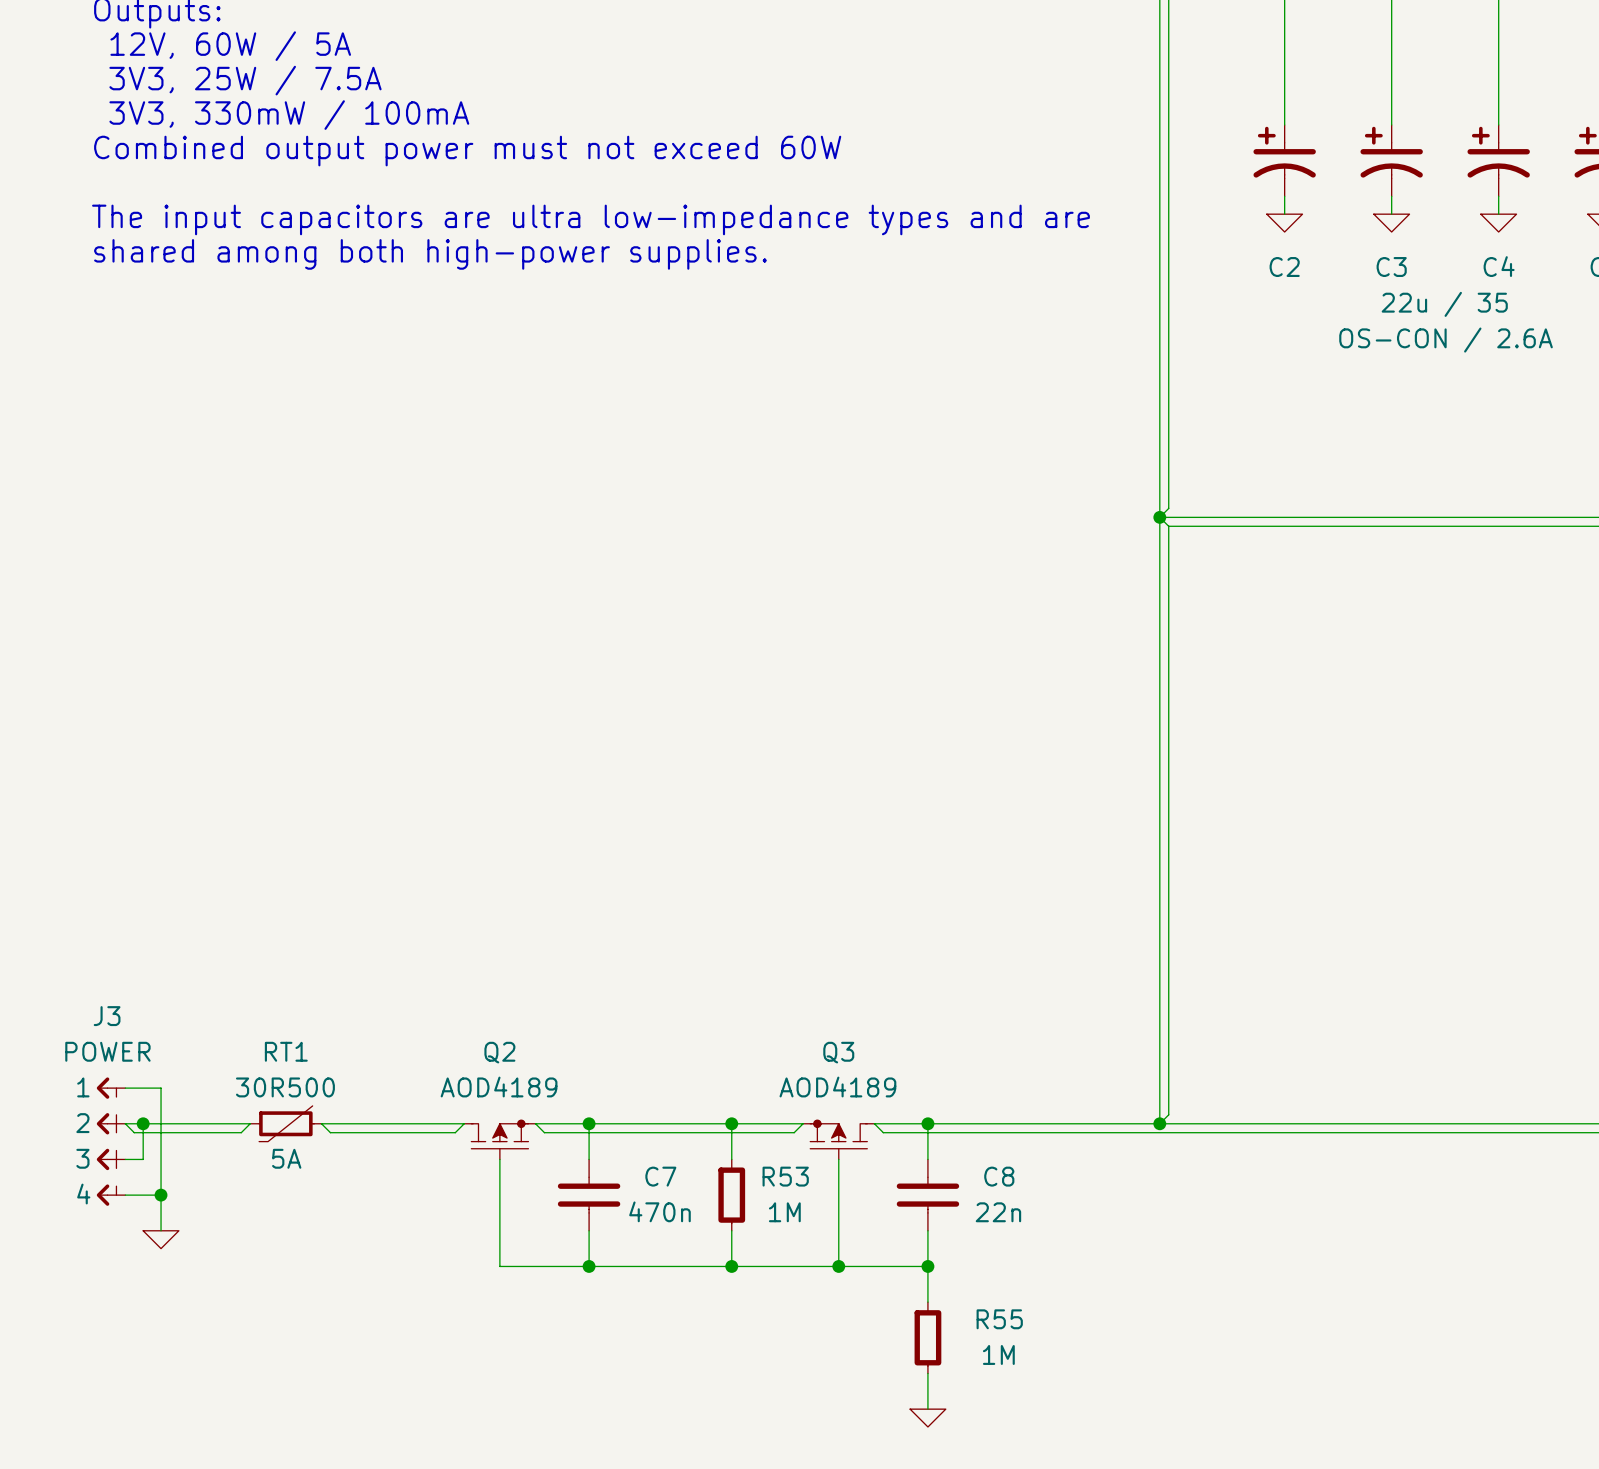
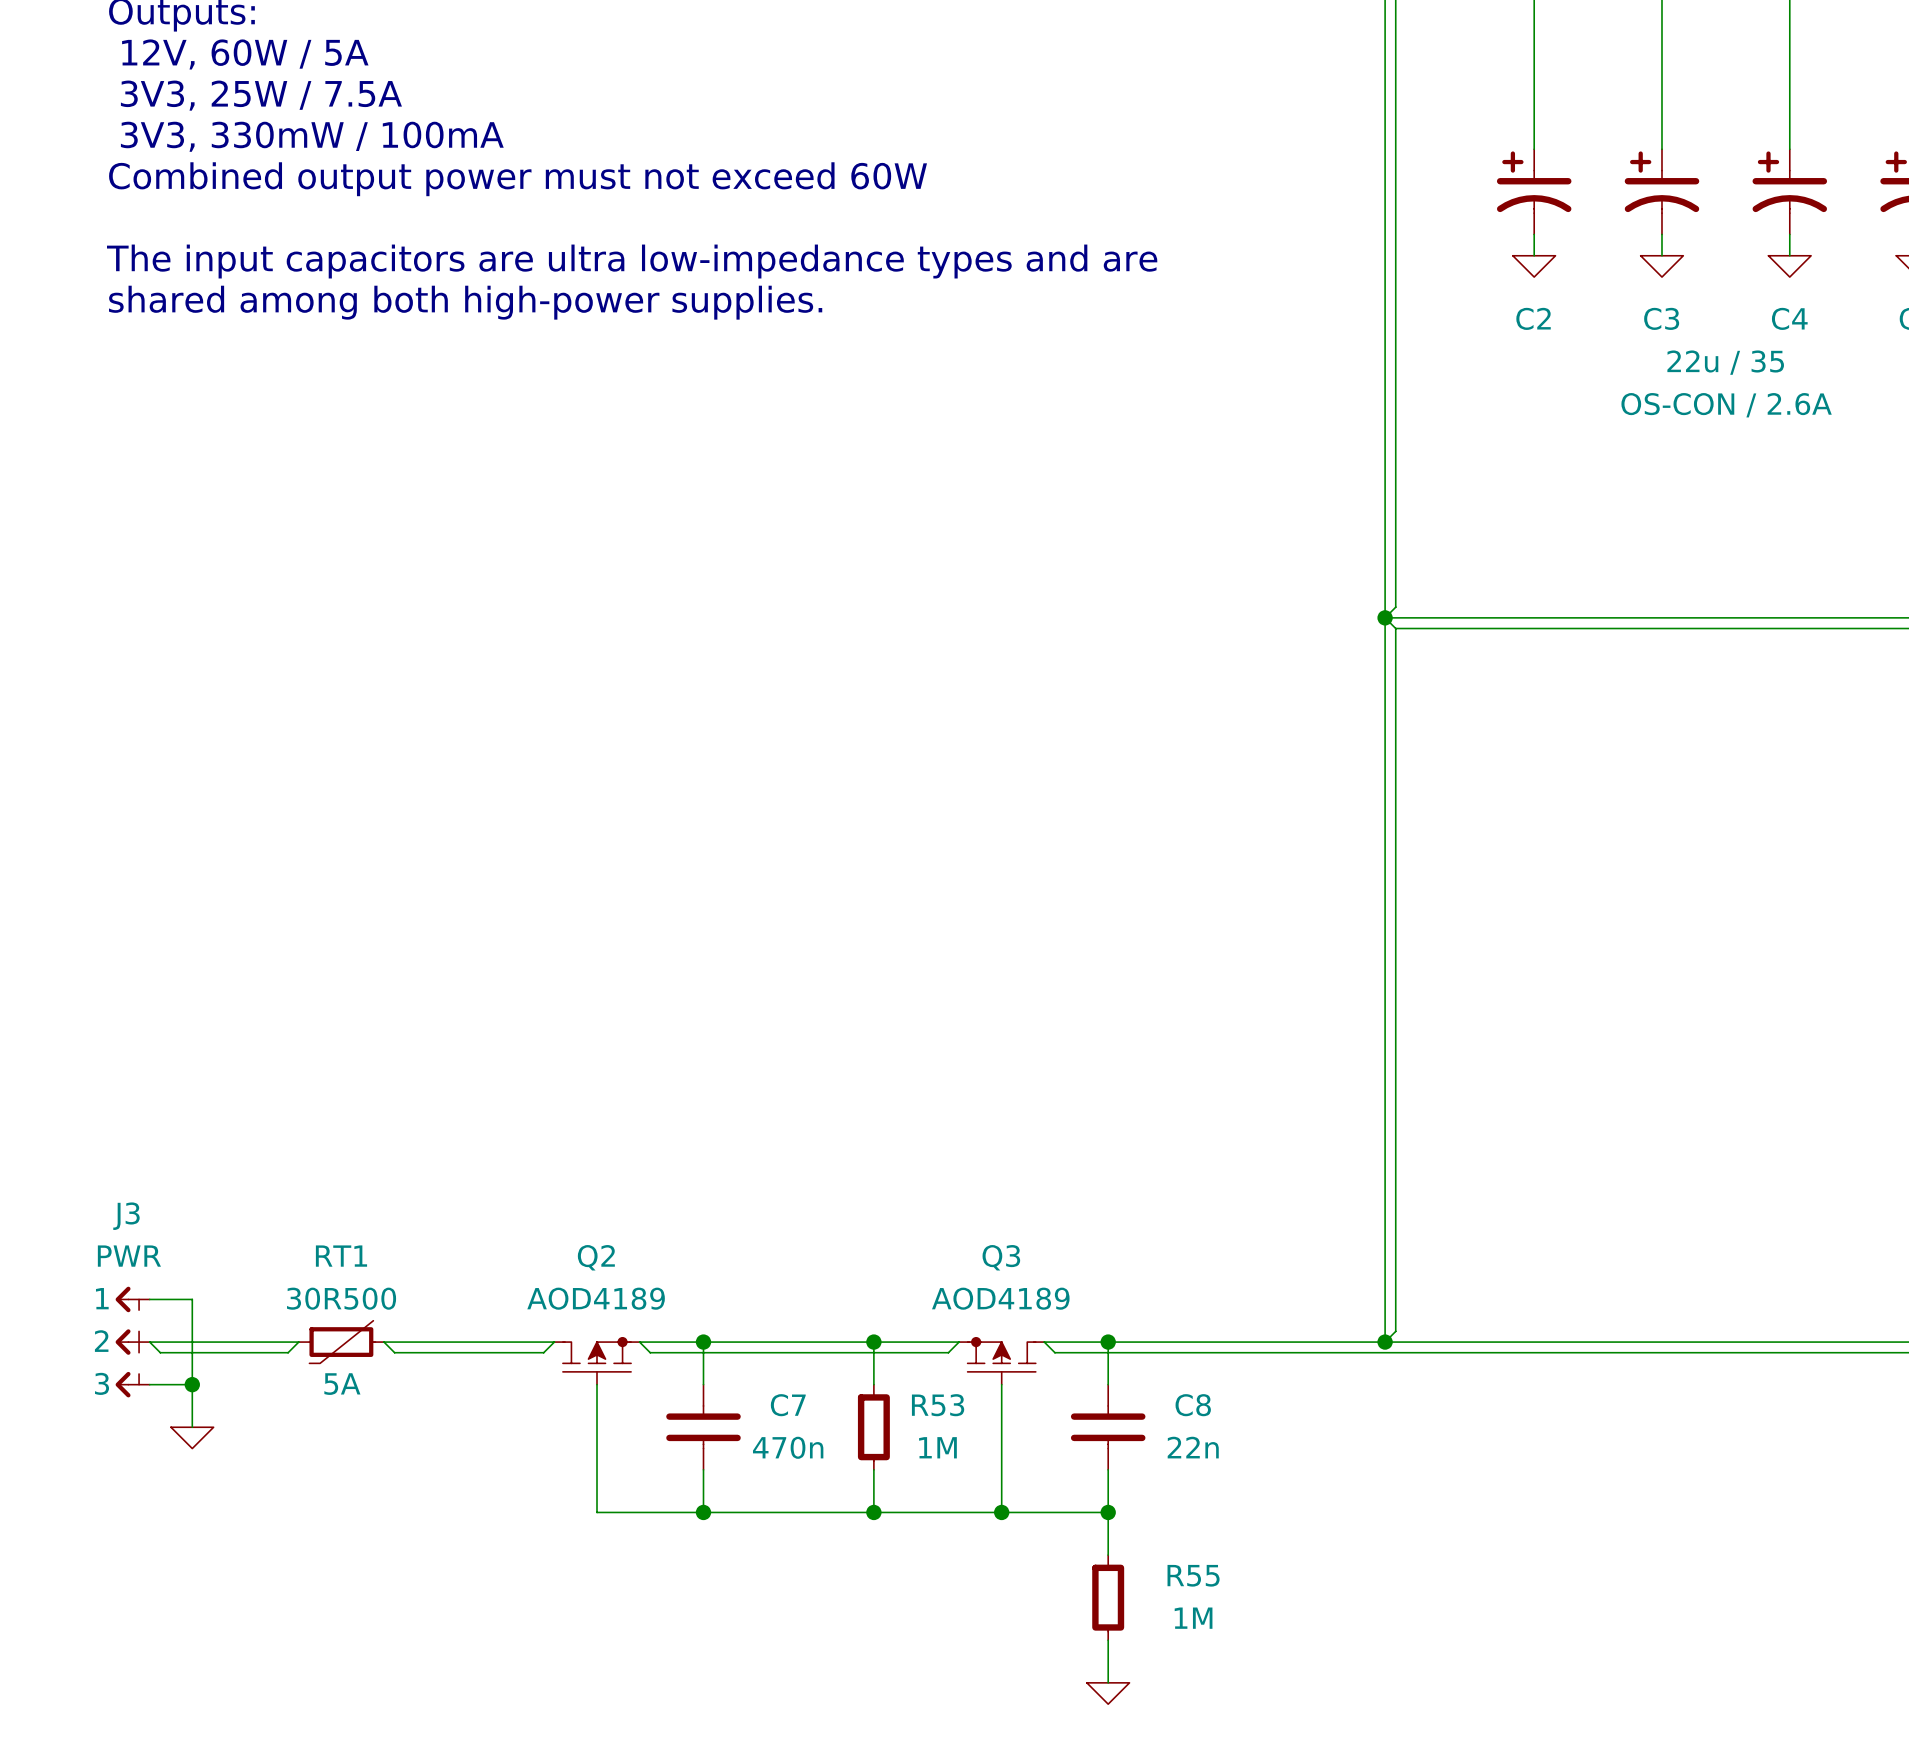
J3 value: POWER (107, 1051) -> PWR (129, 1256)
J3 symbol: [96, 1077, 126, 1206] -> [115, 1286, 150, 1398]
wire: (143, 1123) (143, 1159) -> (192, 1384) (171, 1384)
junction: (143, 1123) -> none
junction: none -> (192, 1384)
wire: (125, 1195) (161, 1195) (161, 1230) -> none
junction: (161, 1195) -> none
power symbol position: (161, 1239) -> (192, 1437)

